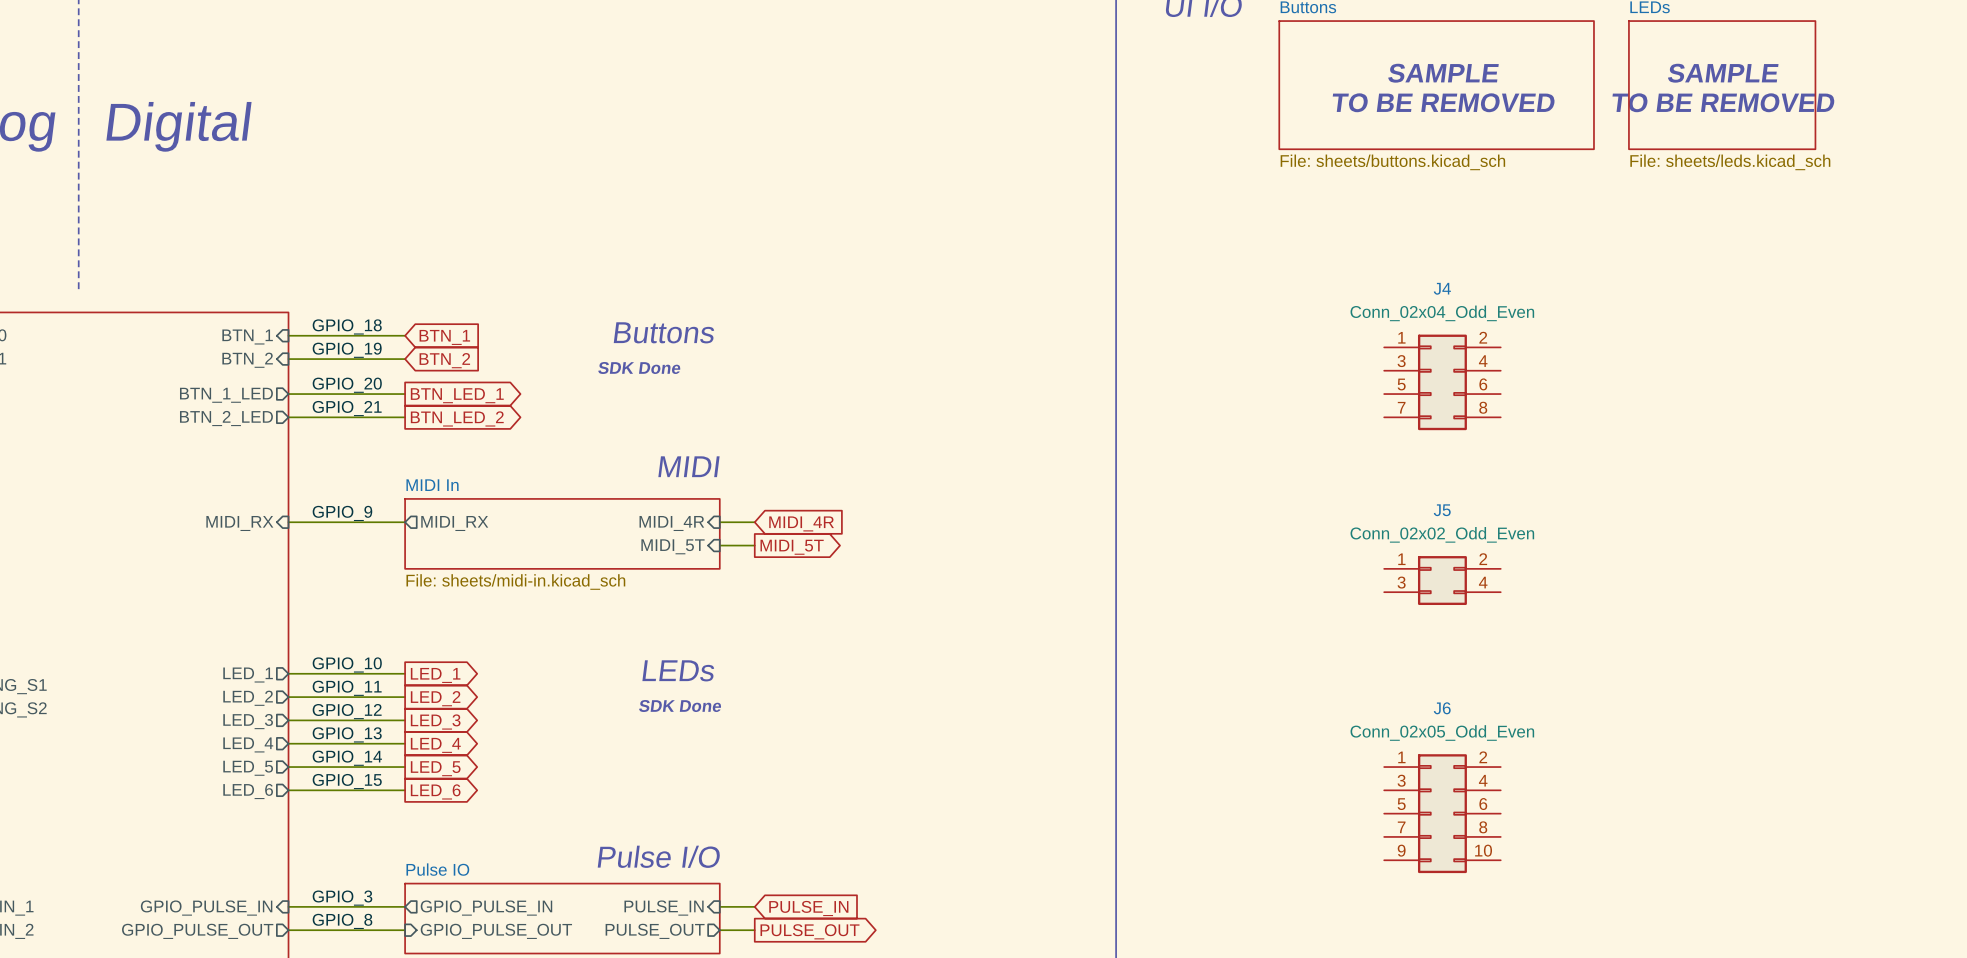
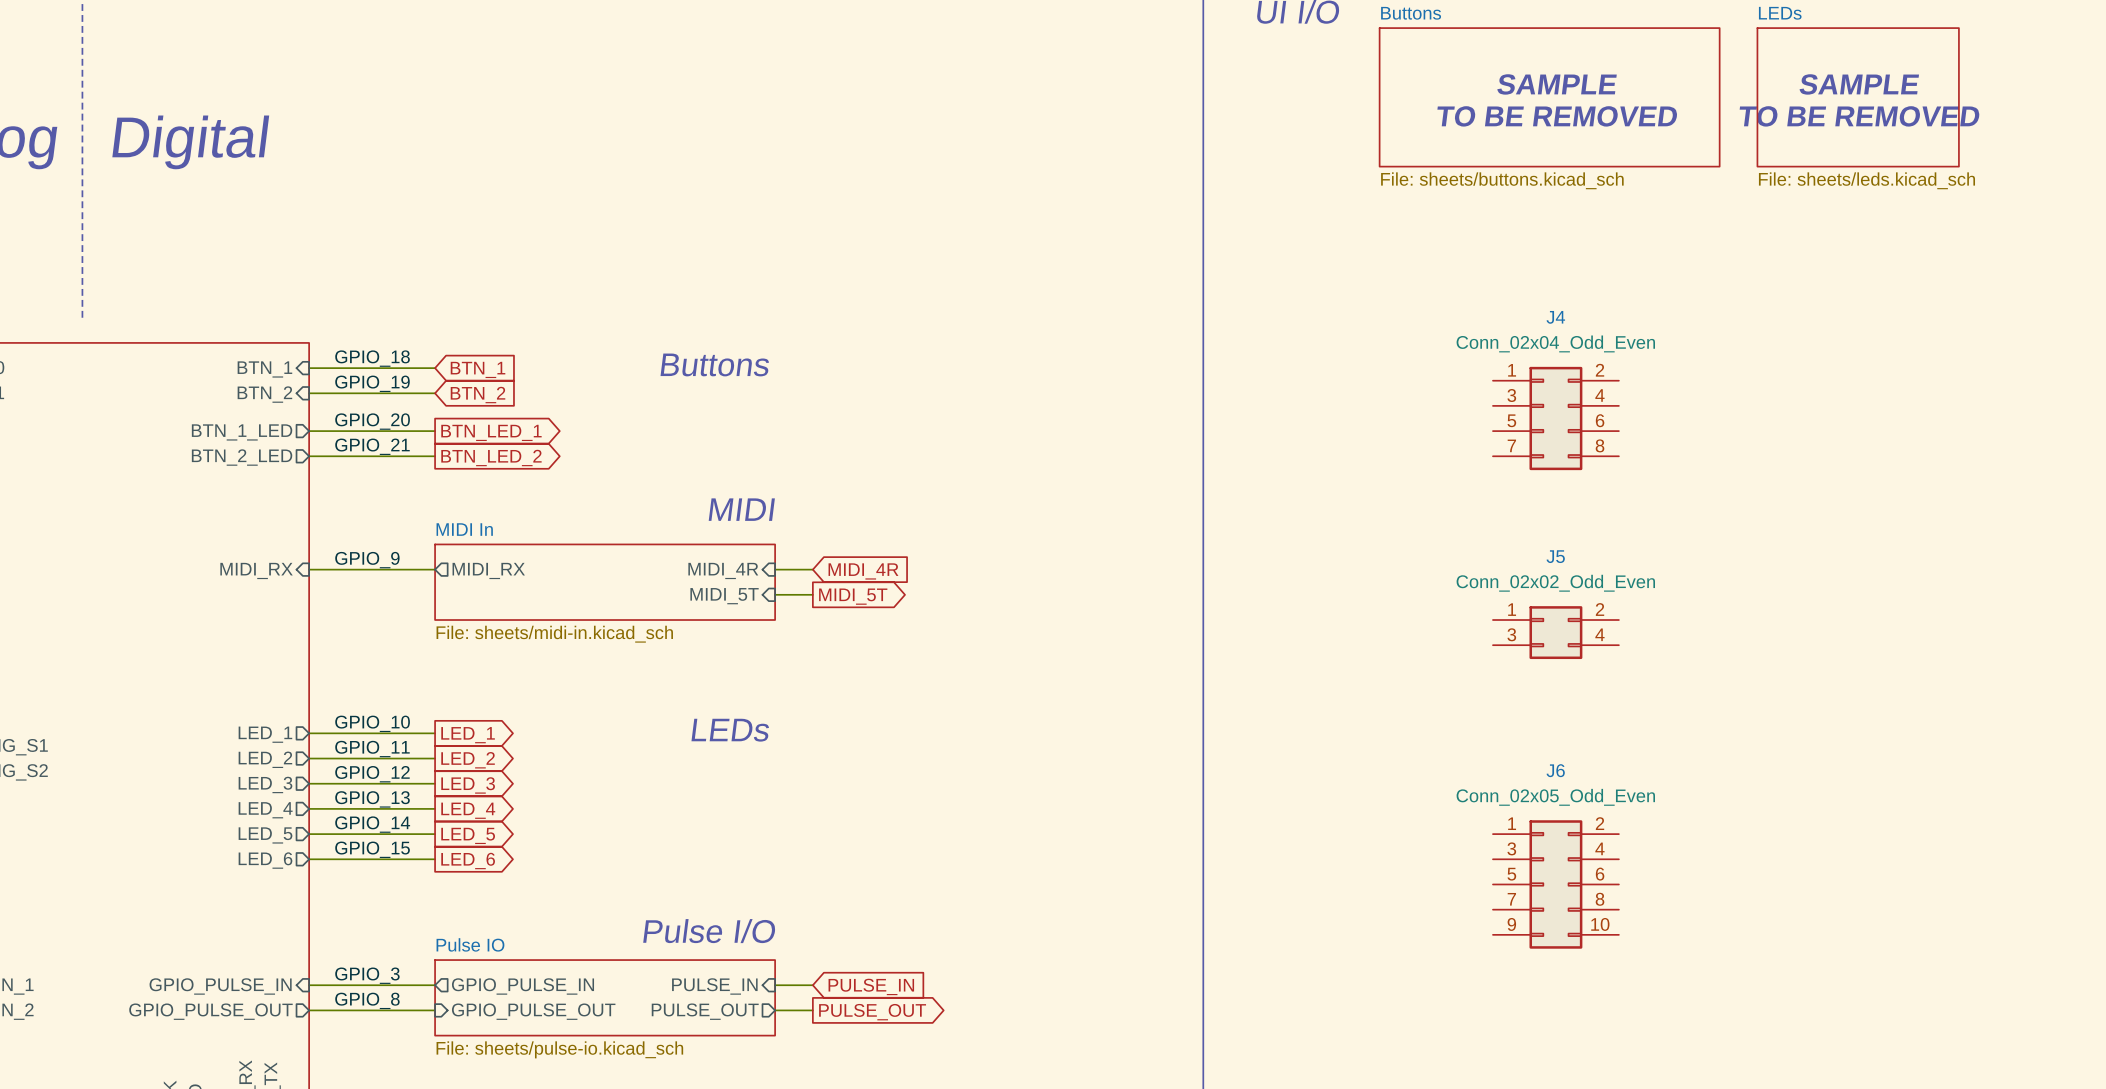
text: SDK Done (639, 367) -> none
text: SDK Done (680, 706) -> none

